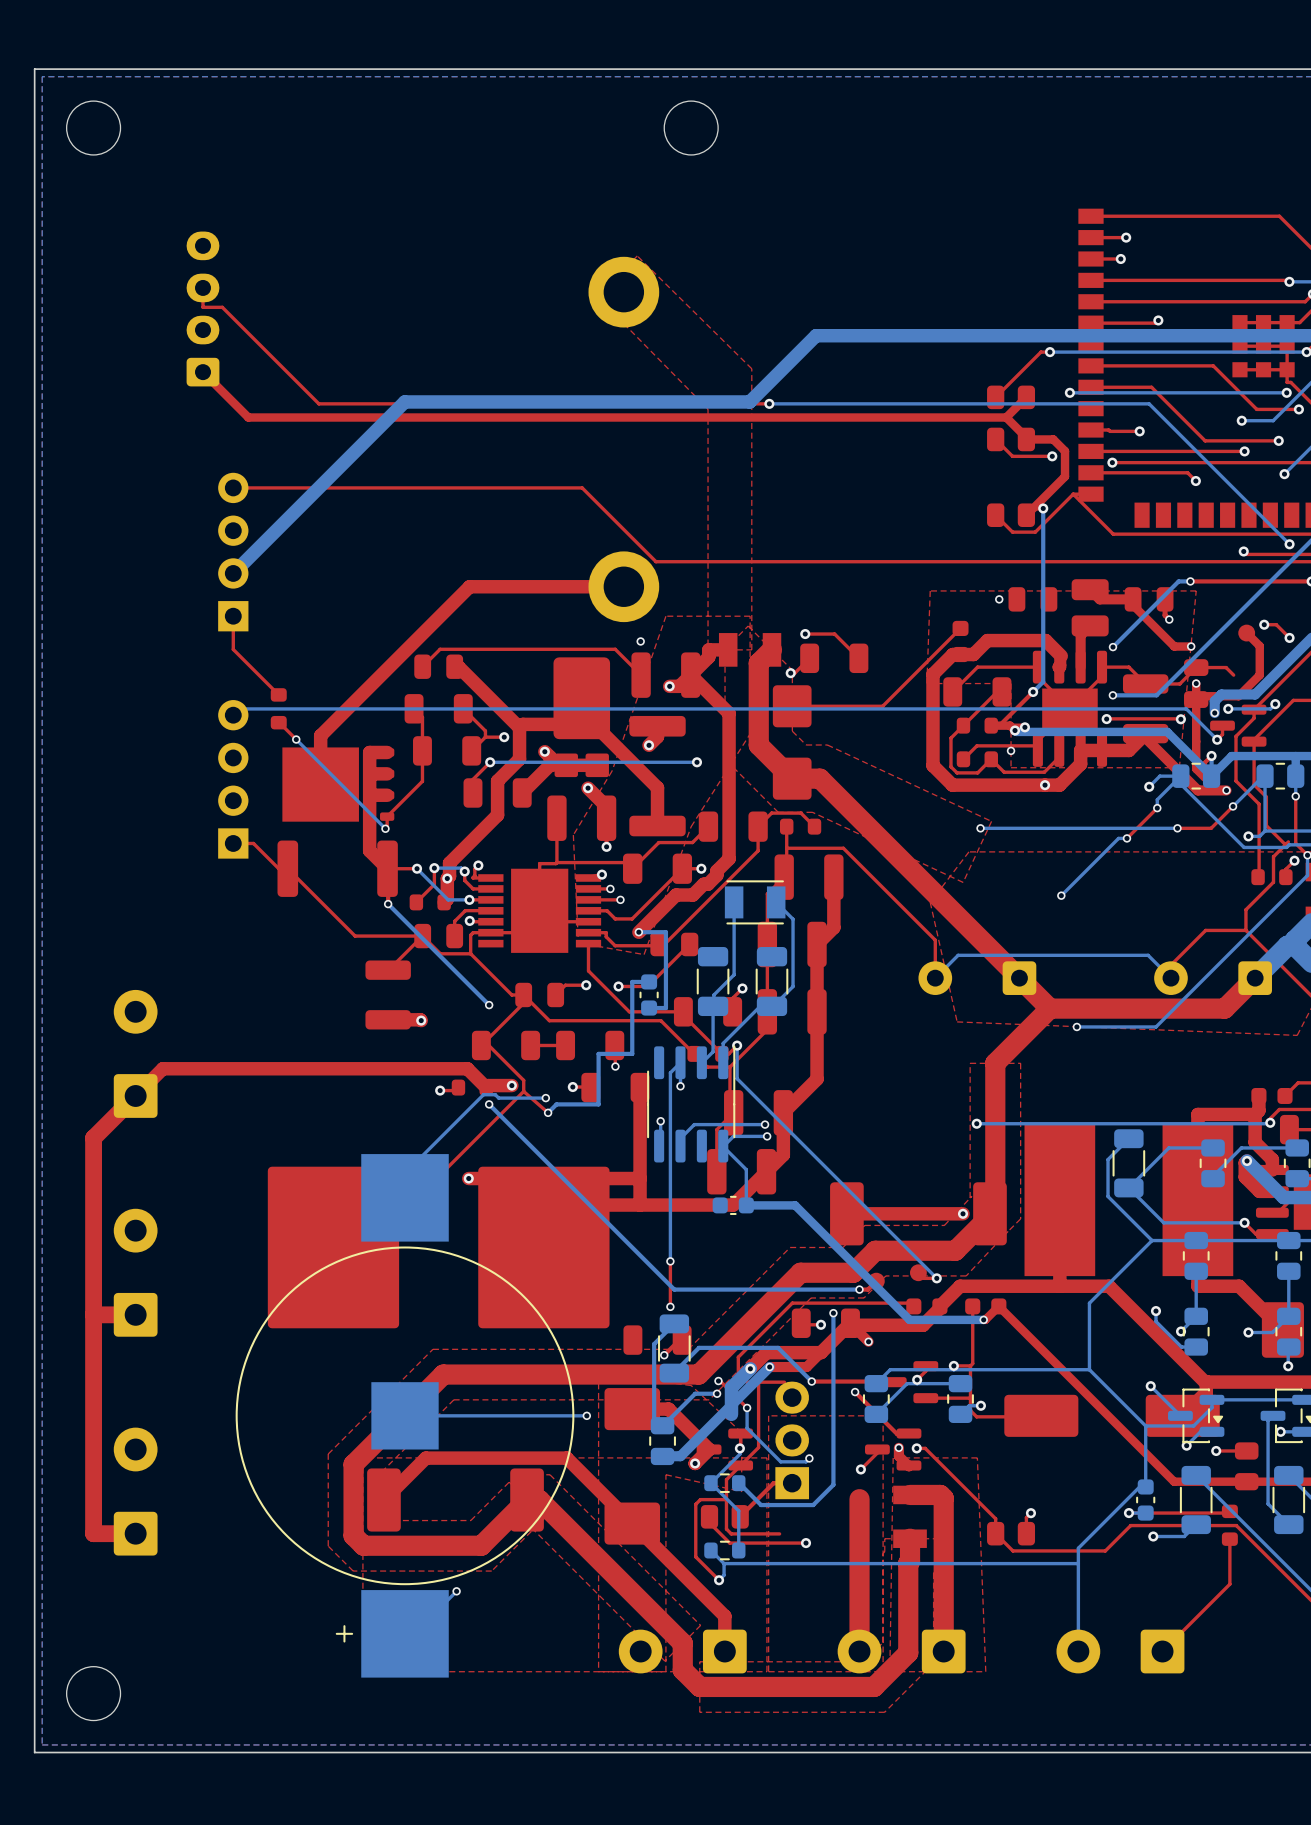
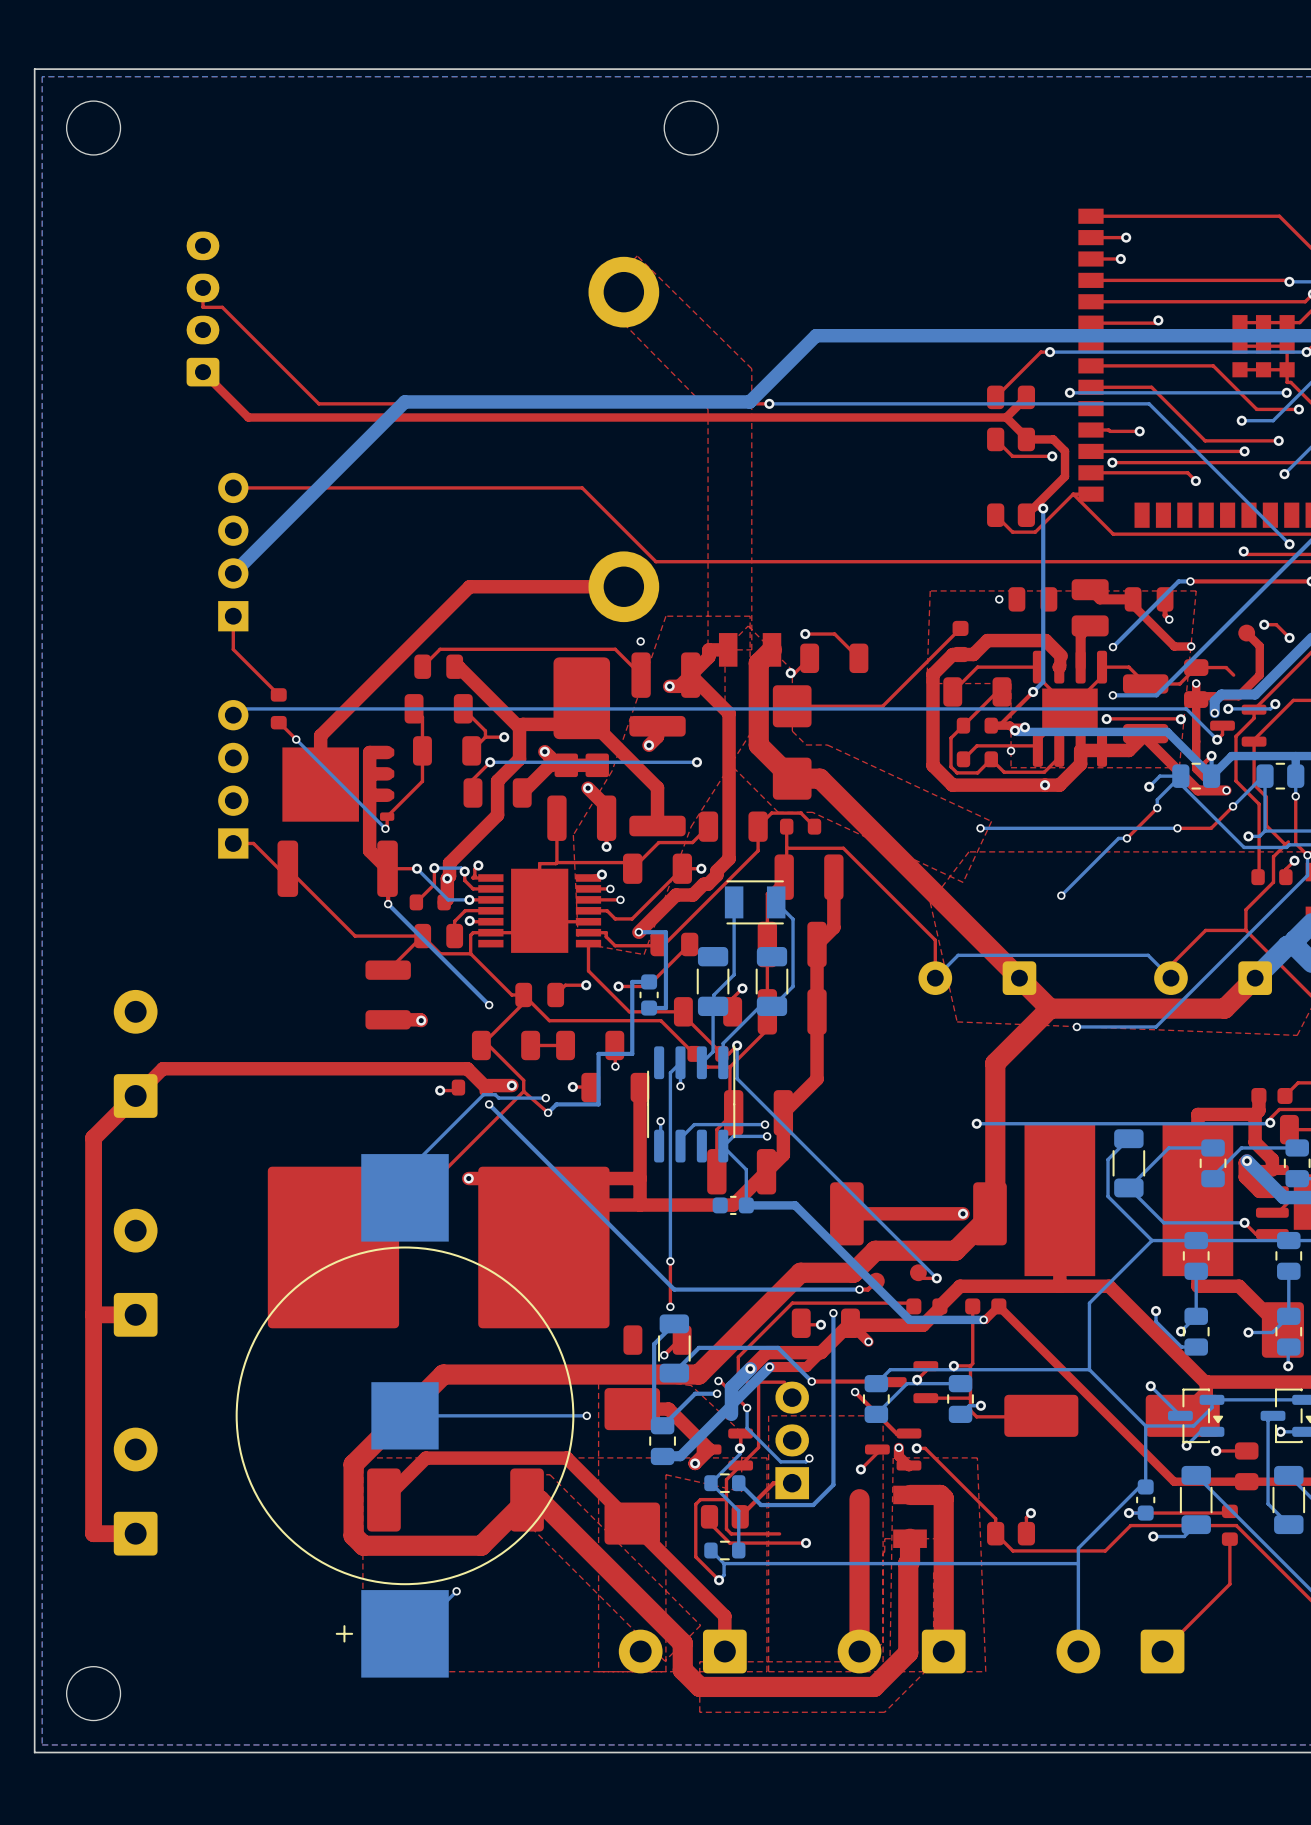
top zone outline: (1020, 1063) (1020, 1218) (966, 1275) (885, 1275) (863, 1297) (811, 1297) (709, 1399) (453, 1399) (378, 1474) (378, 1525) (374, 1520) (470, 1520) (509, 1482) (544, 1517) (491, 1571) (353, 1571) (328, 1546) (328, 1454) (432, 1349) (688, 1349) (790, 1247) (842, 1247) (864, 1225) (944, 1225) (971, 1196) (970, 1197) (970, 1063) (1020, 1063) -> none

